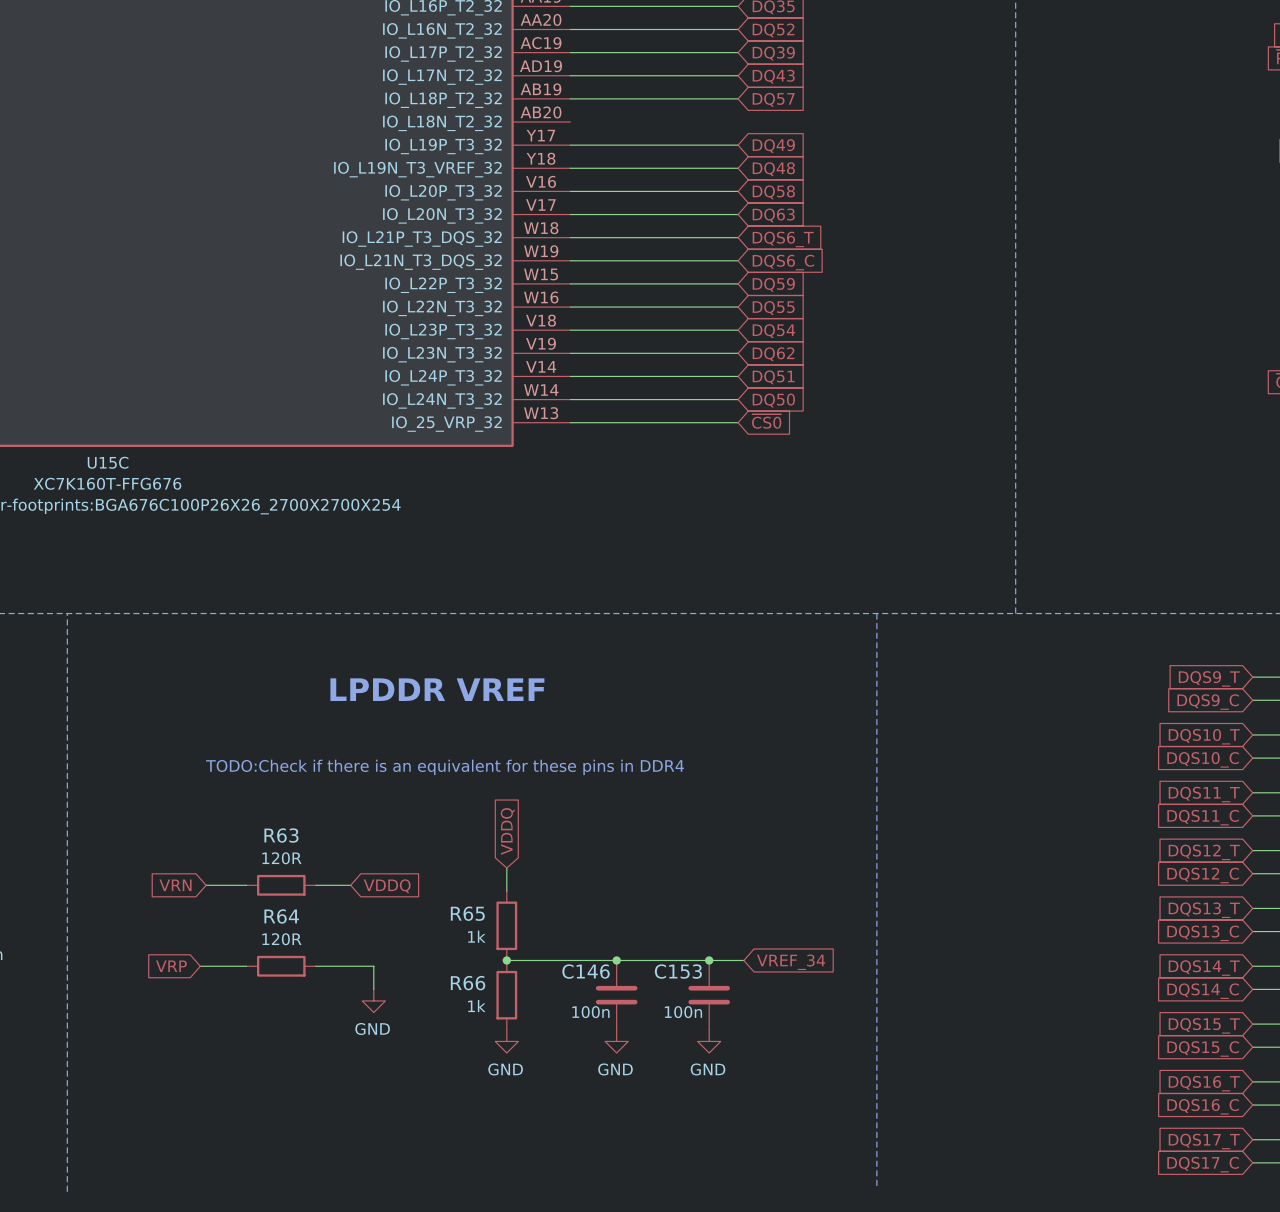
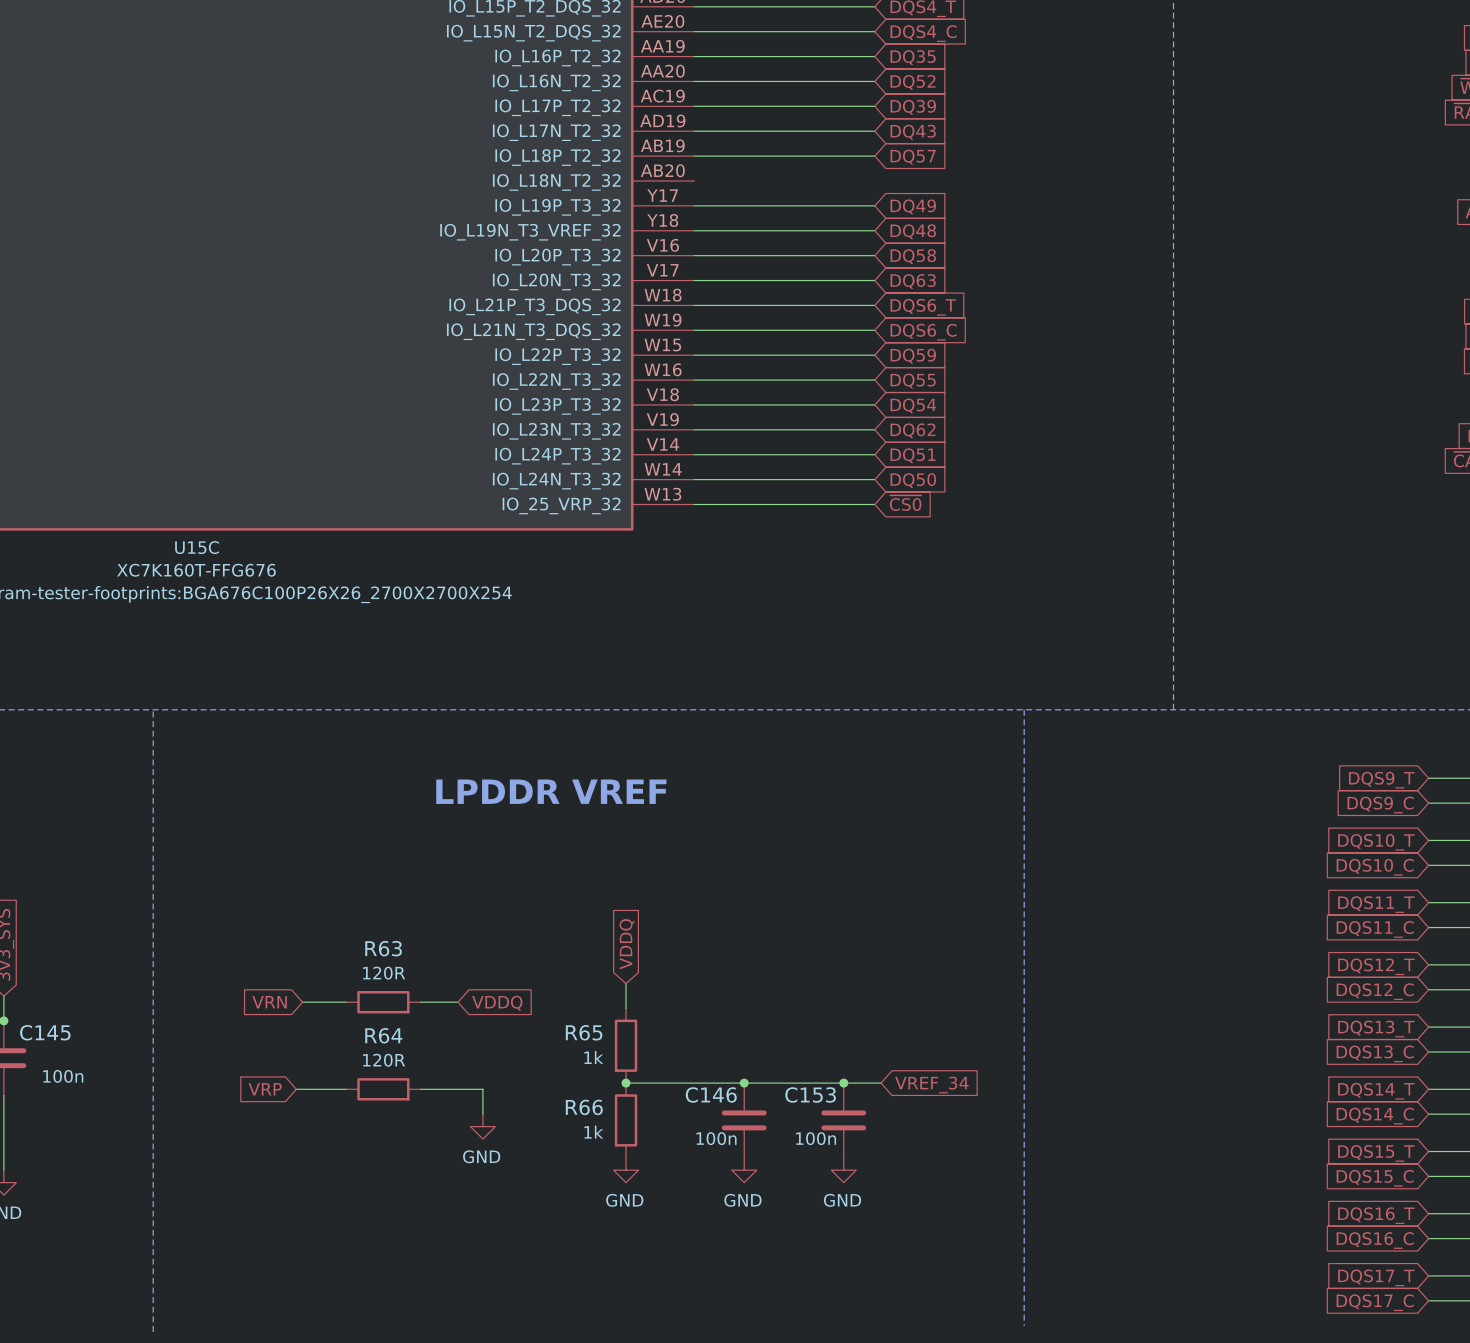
text: TODO:Check if there is an equivalent for these pins in DDR4 (445, 767) -> none

